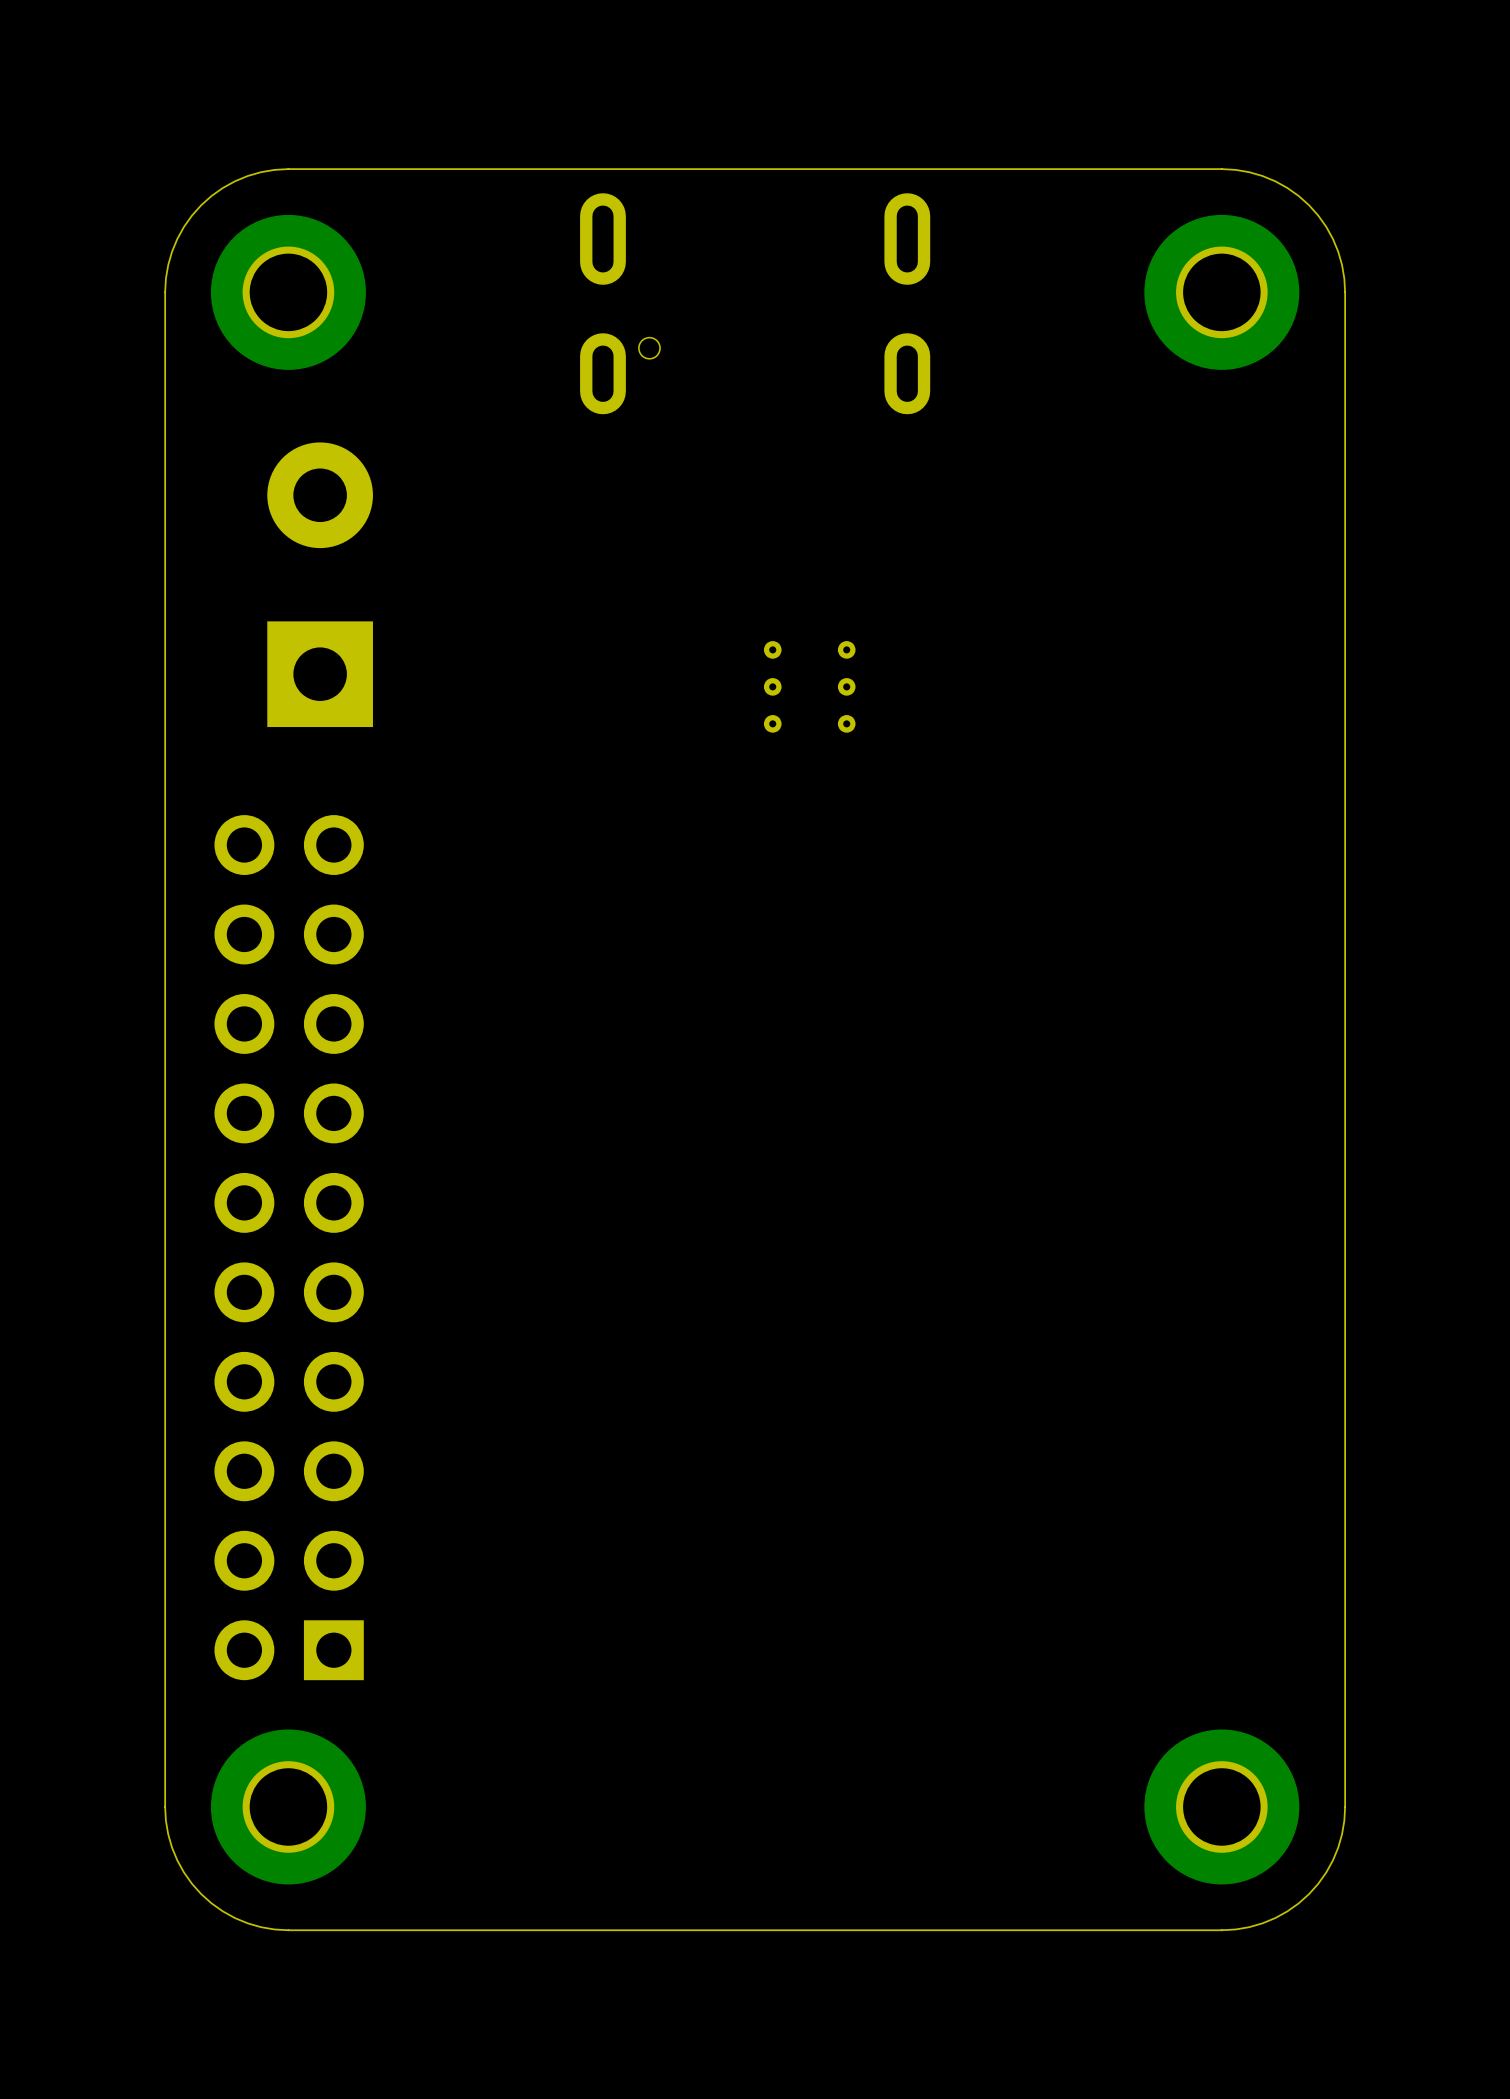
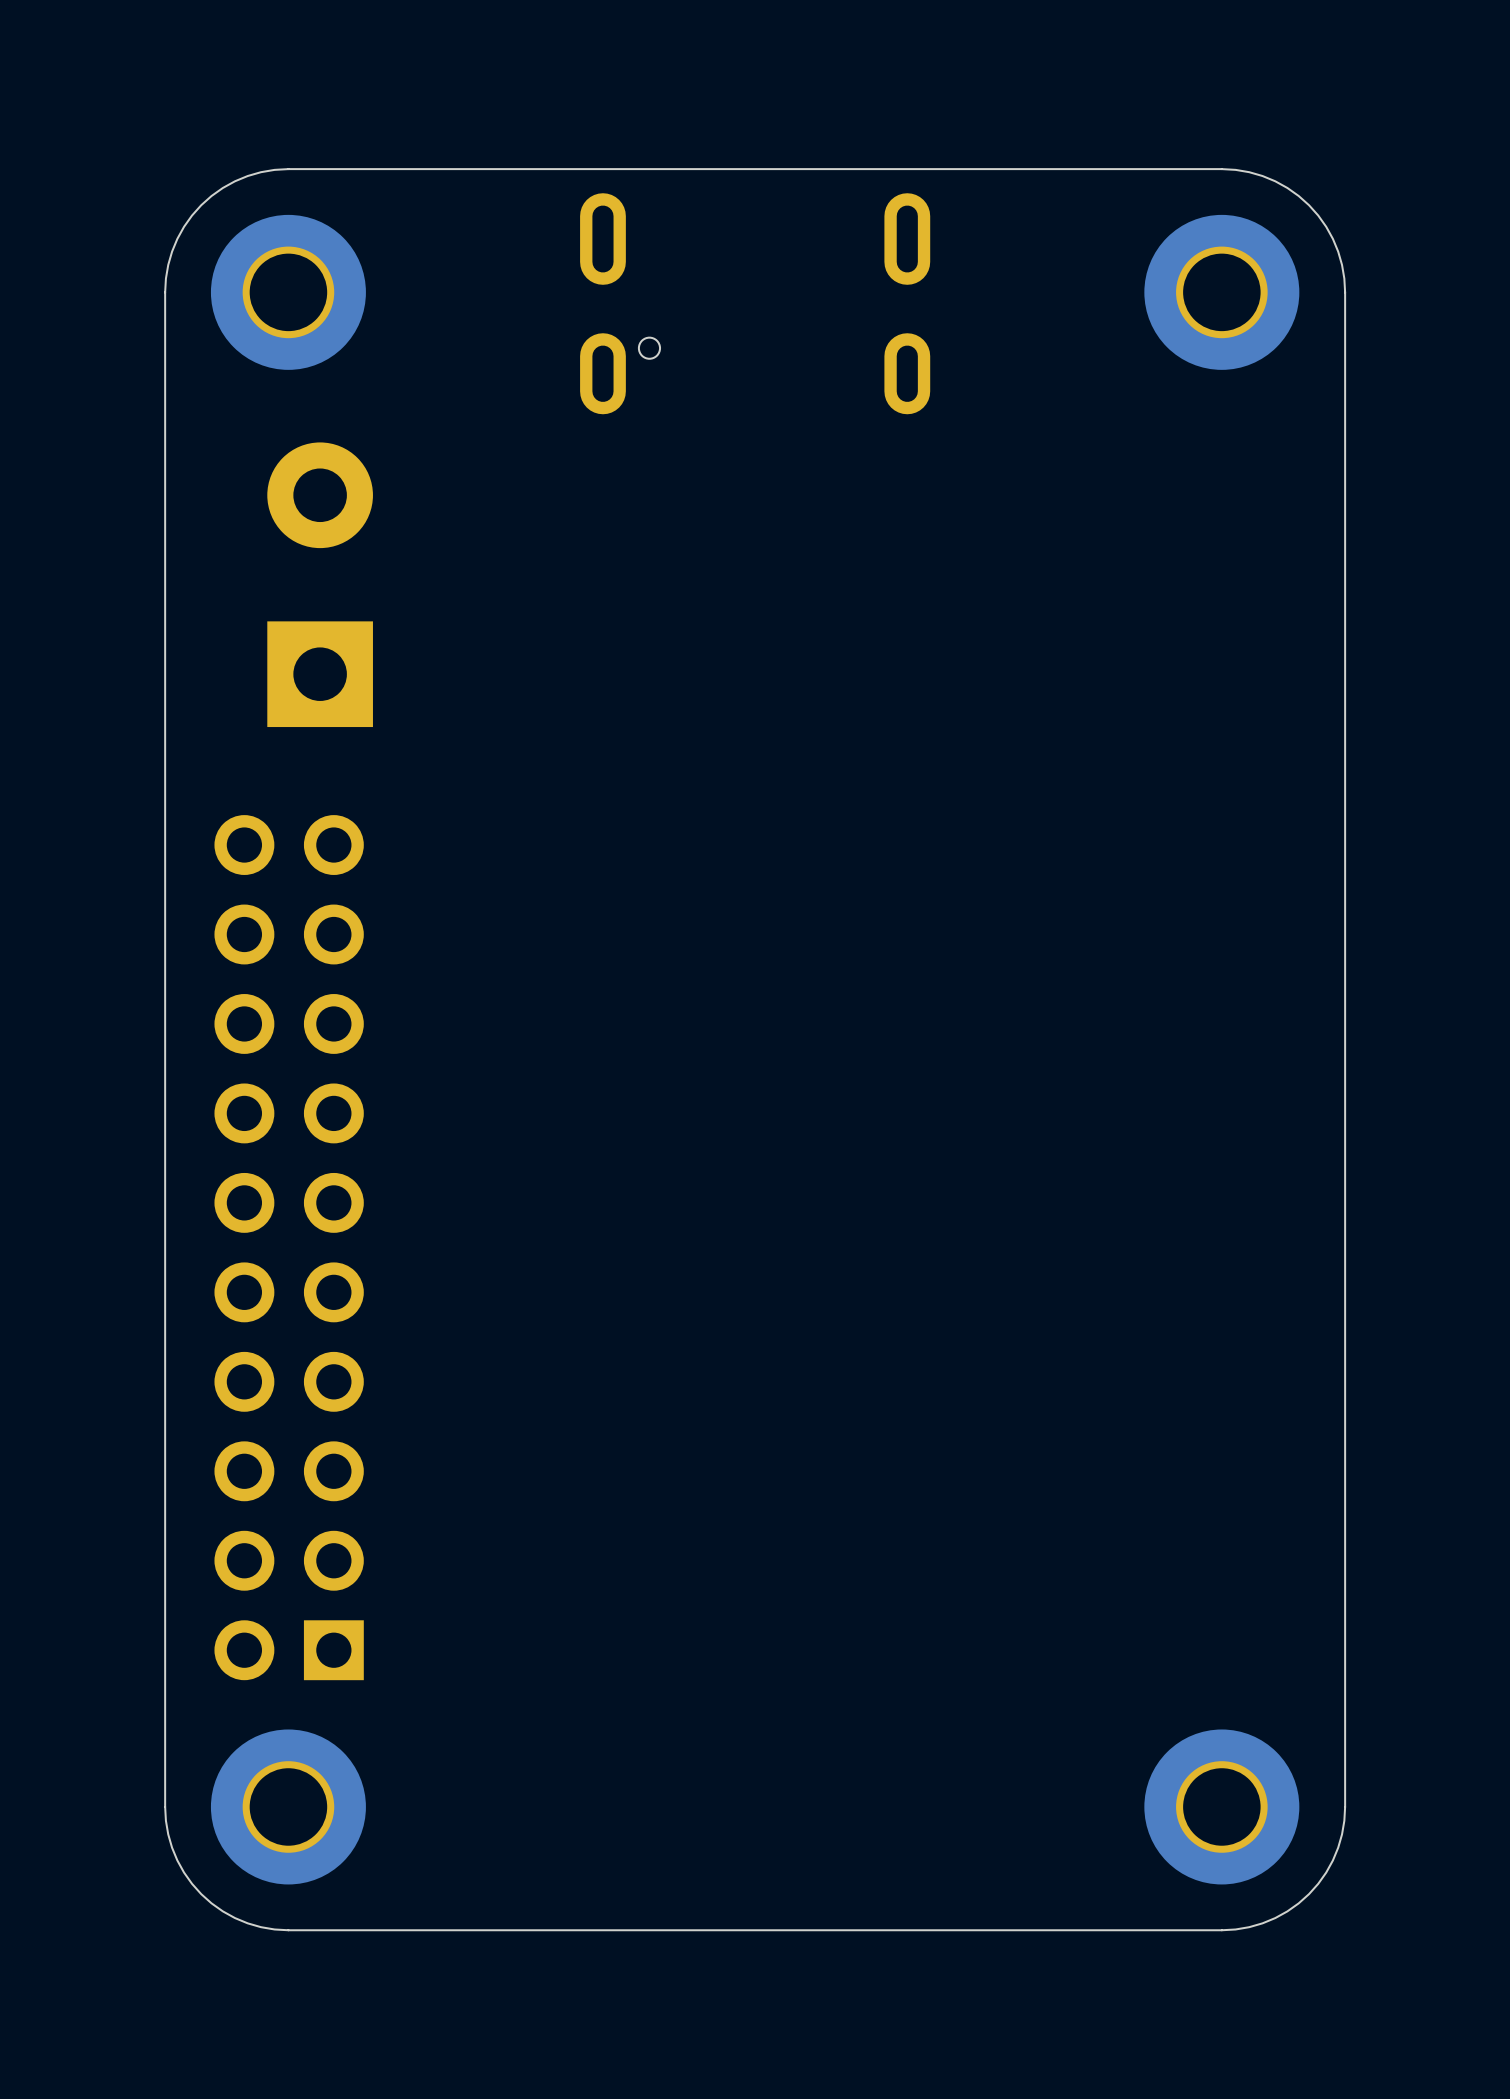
part: (809, 686) -> none

